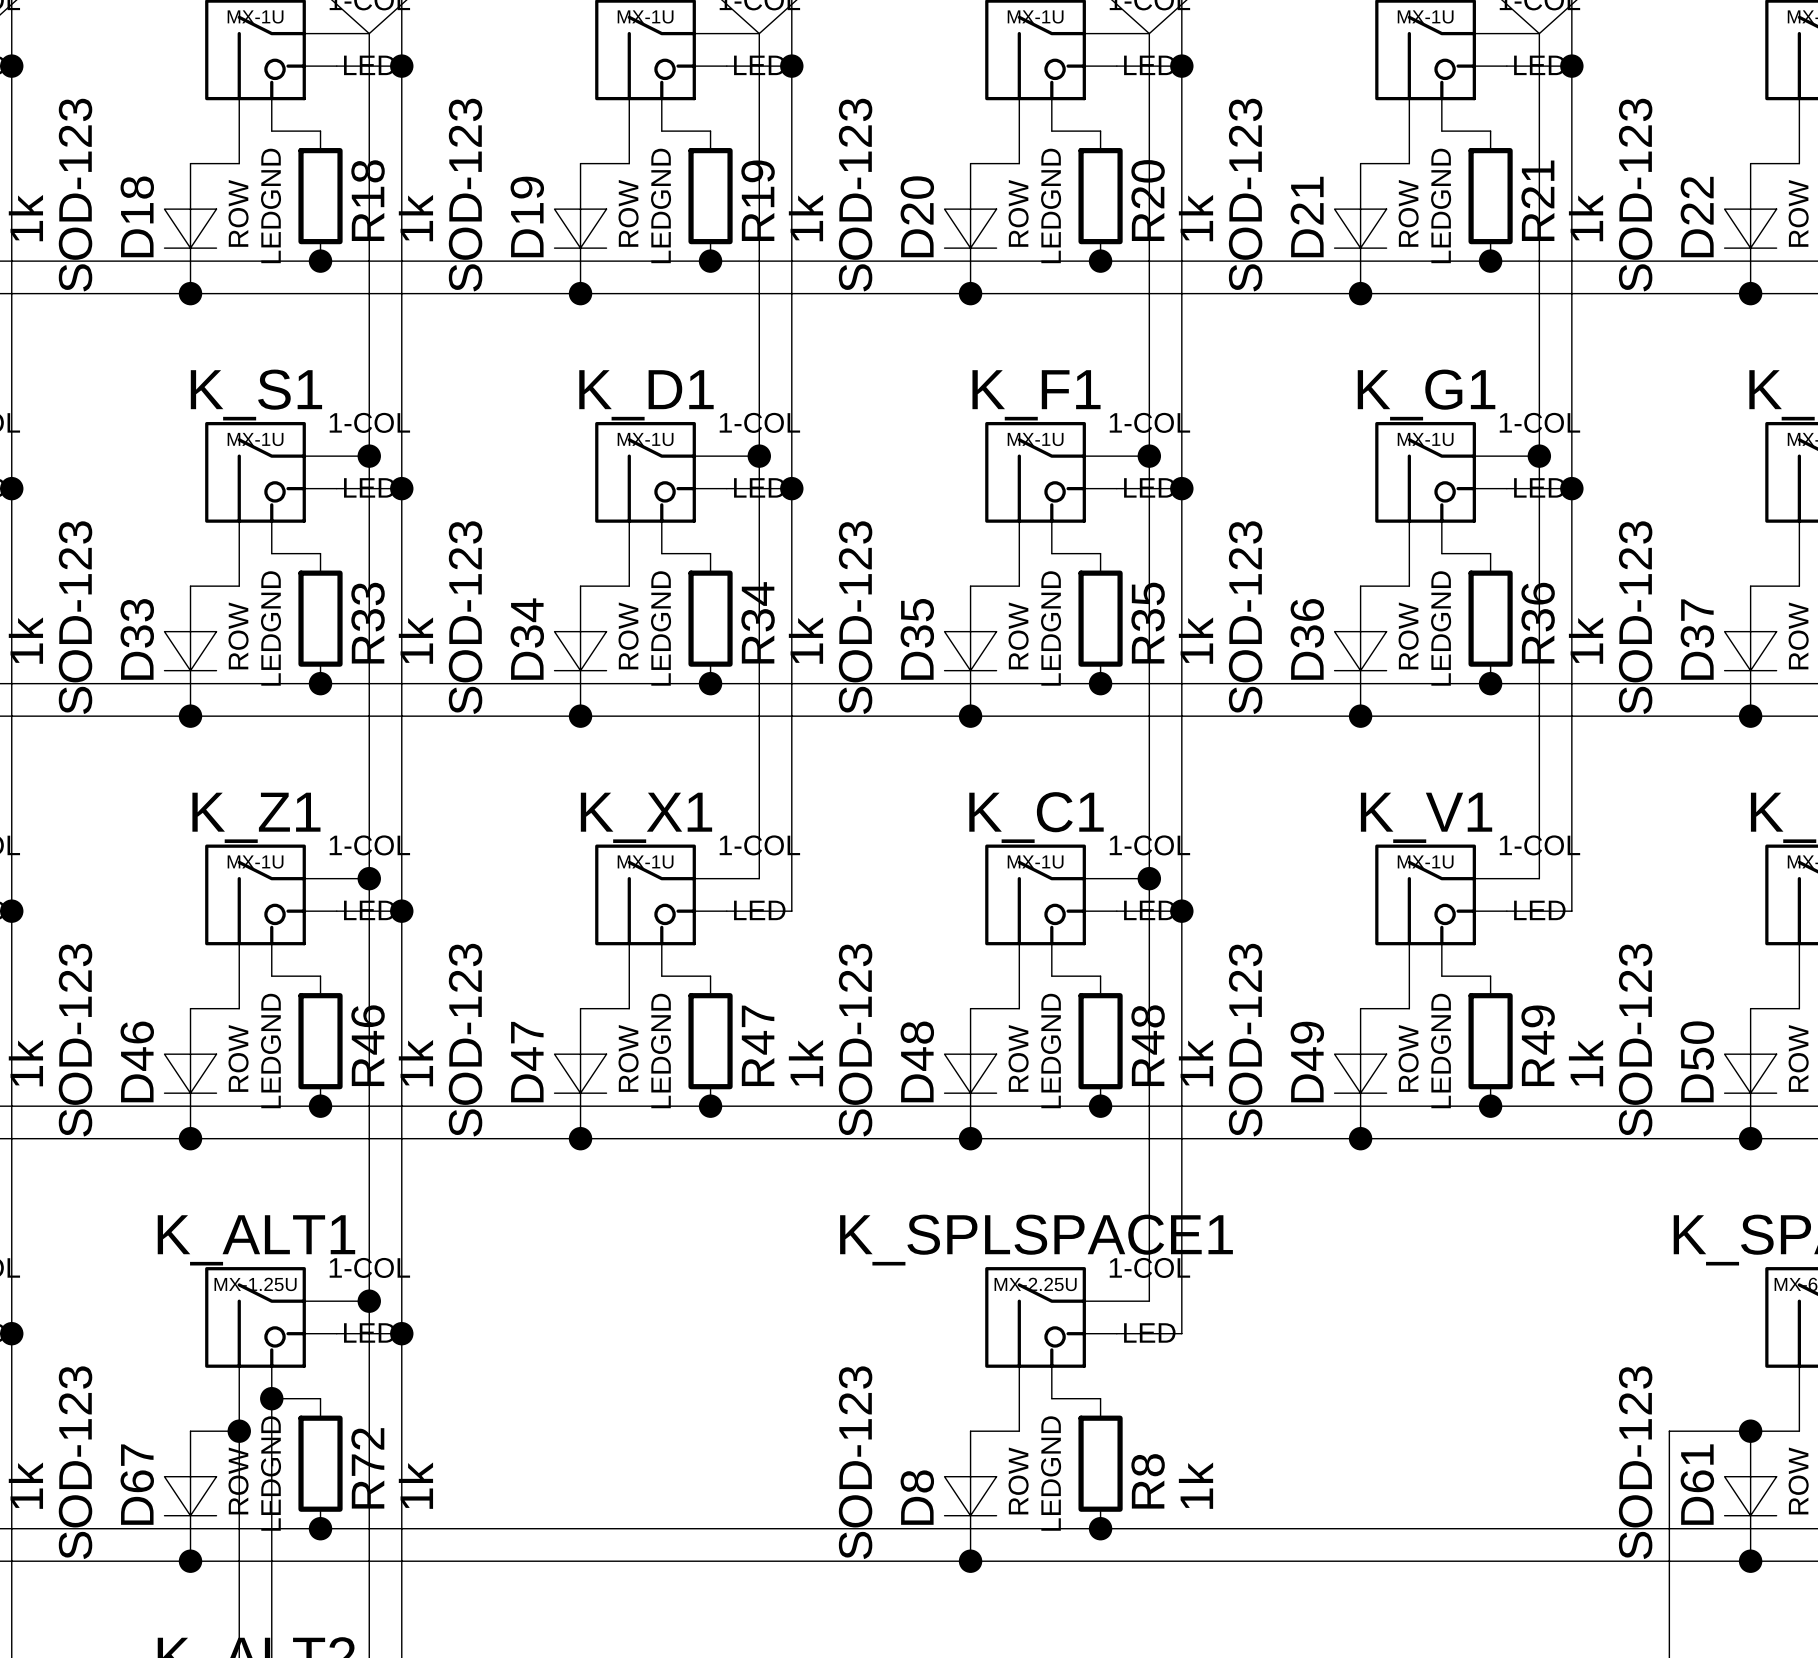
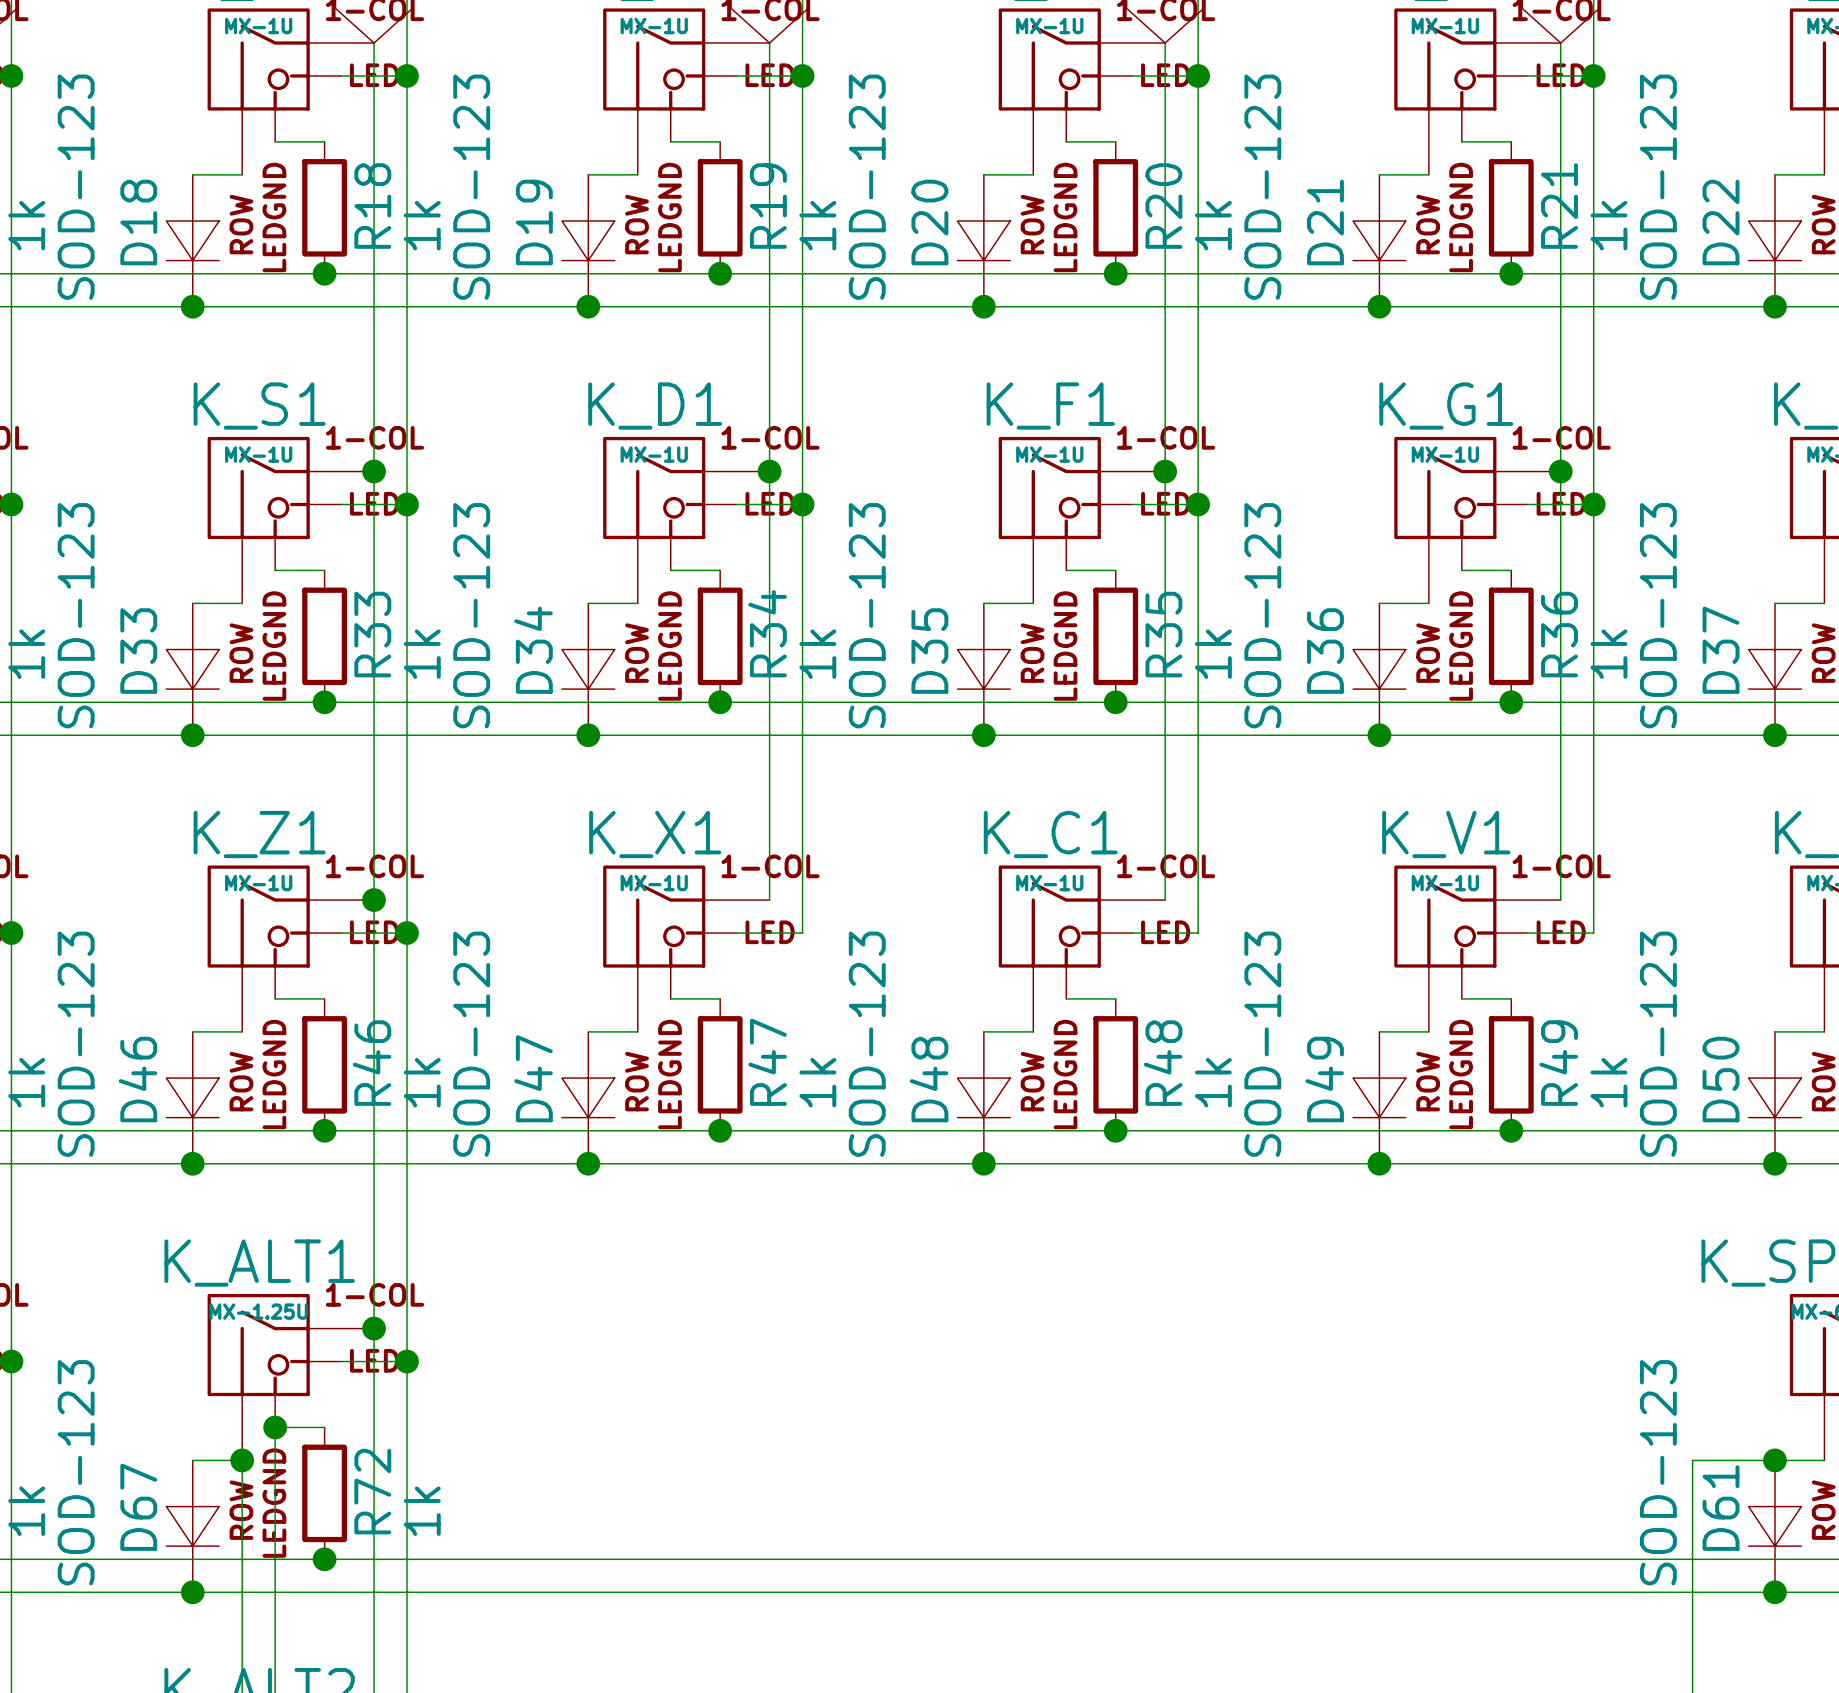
wire: (1149, 878) (1149, 1301) -> none
junction: (1149, 878) -> none
wire: (1181, 911) (1181, 1333) (1116, 1333) -> none
junction: (1181, 911) -> none
K_SPLSPACE1: MX-2.25U (1067, 1349) -> none
wire: (1051, 1398) (1100, 1398) -> none
wire: (970, 1431) (1019, 1431) -> none
R8: 1k (1100, 1463) -> none
D8: SOD-123 (970, 1496) -> none
junction: (1100, 1528) -> none
junction: (970, 1561) -> none

